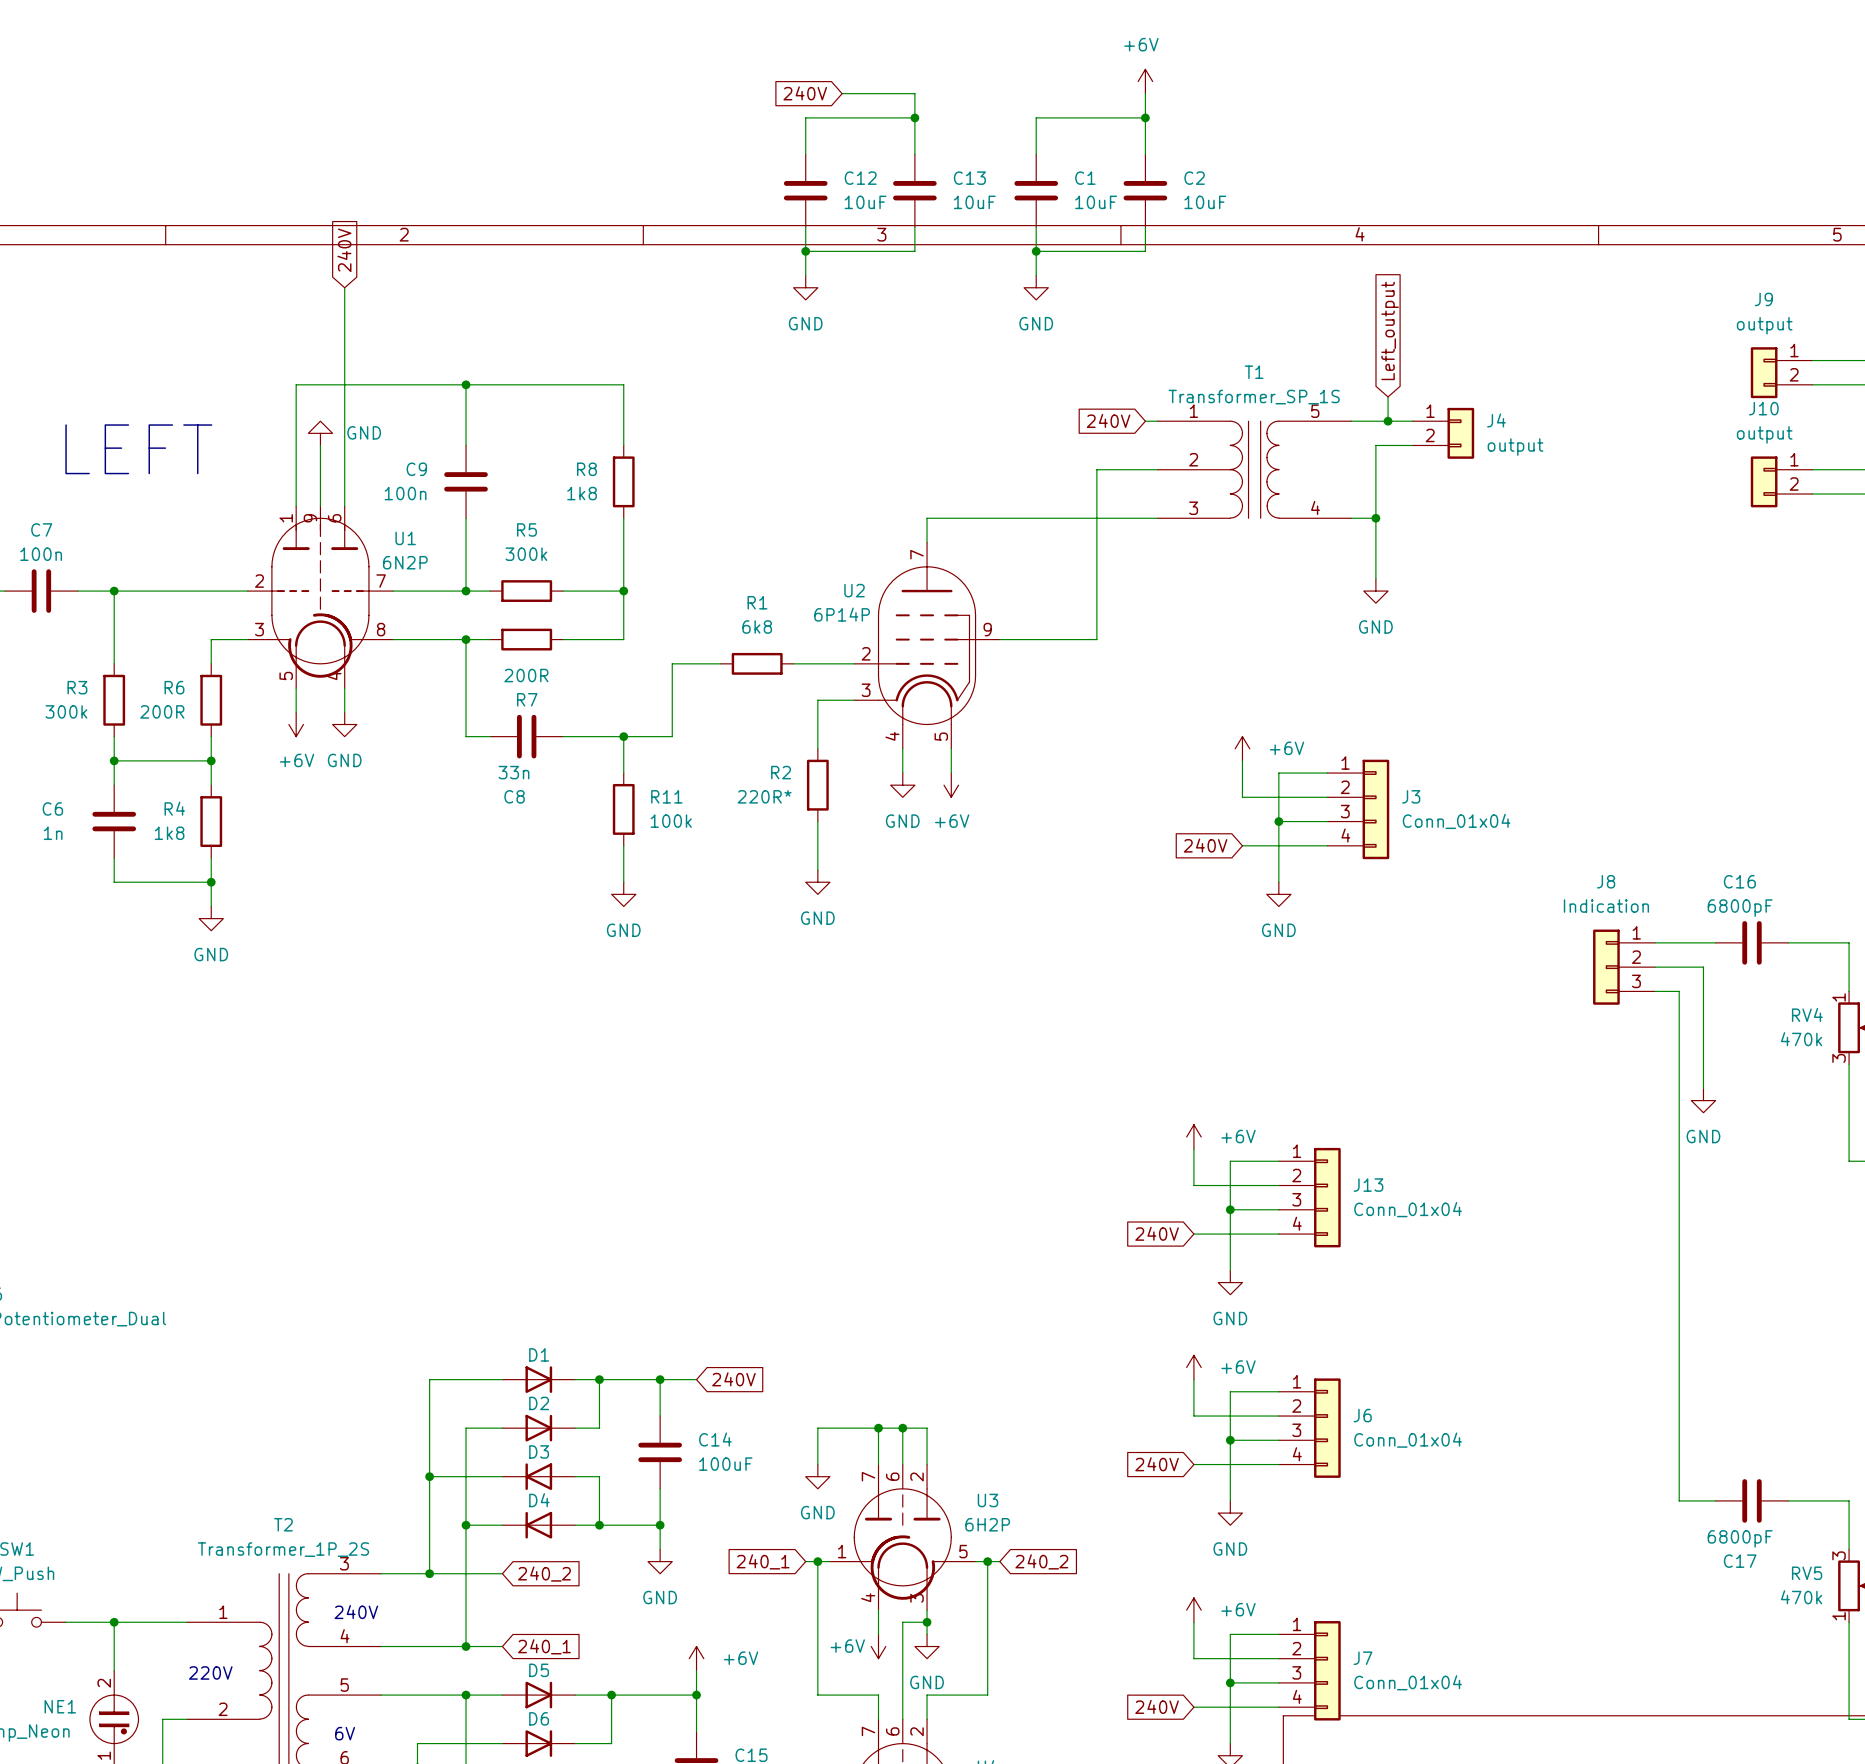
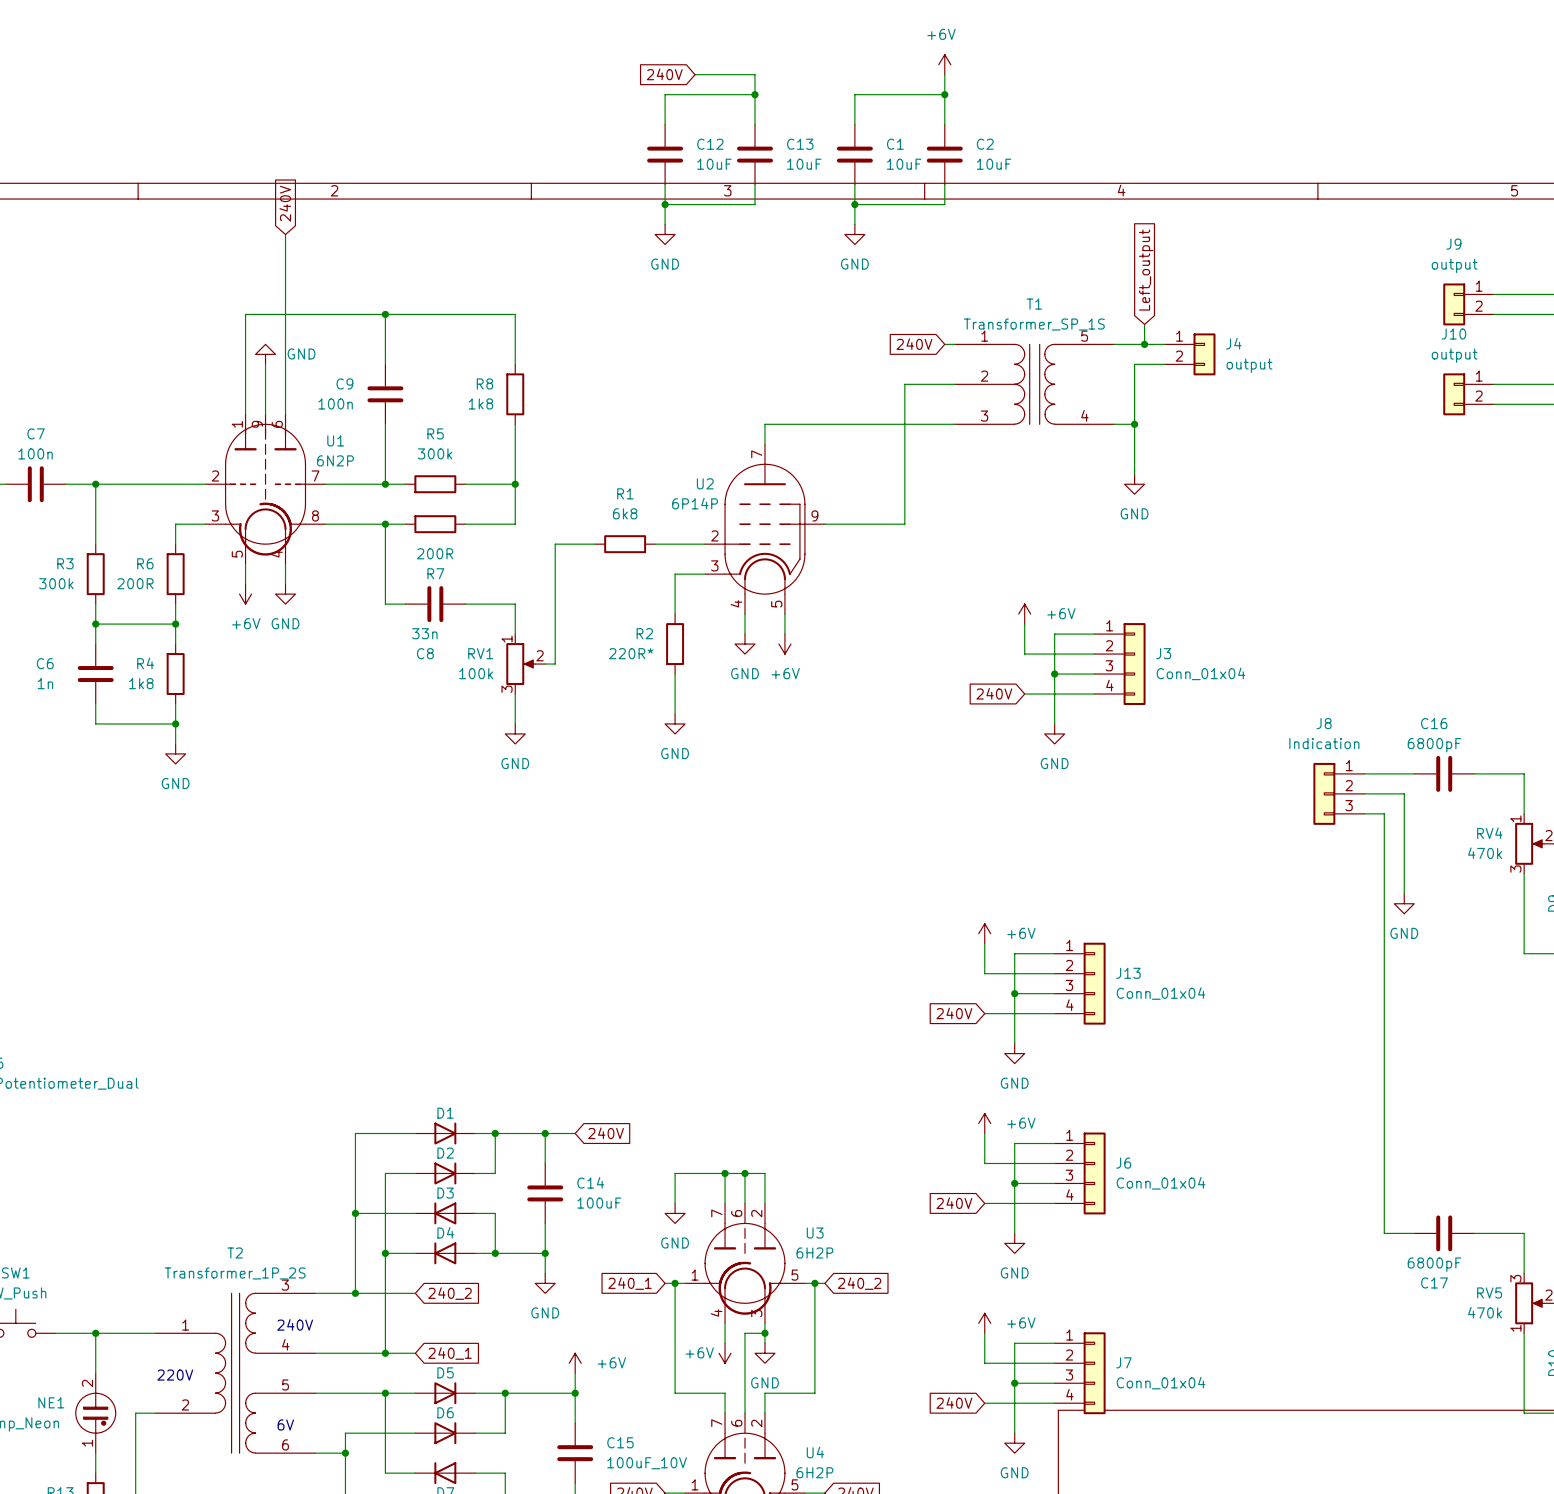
text: LEFT (138, 449) -> none
wire: (623, 736) (672, 736) -> (545, 664) (555, 664) (555, 604)
junction: (623, 736) -> none
R11: 100k (623, 809) -> none
RV1: none -> 100k (525, 664)

